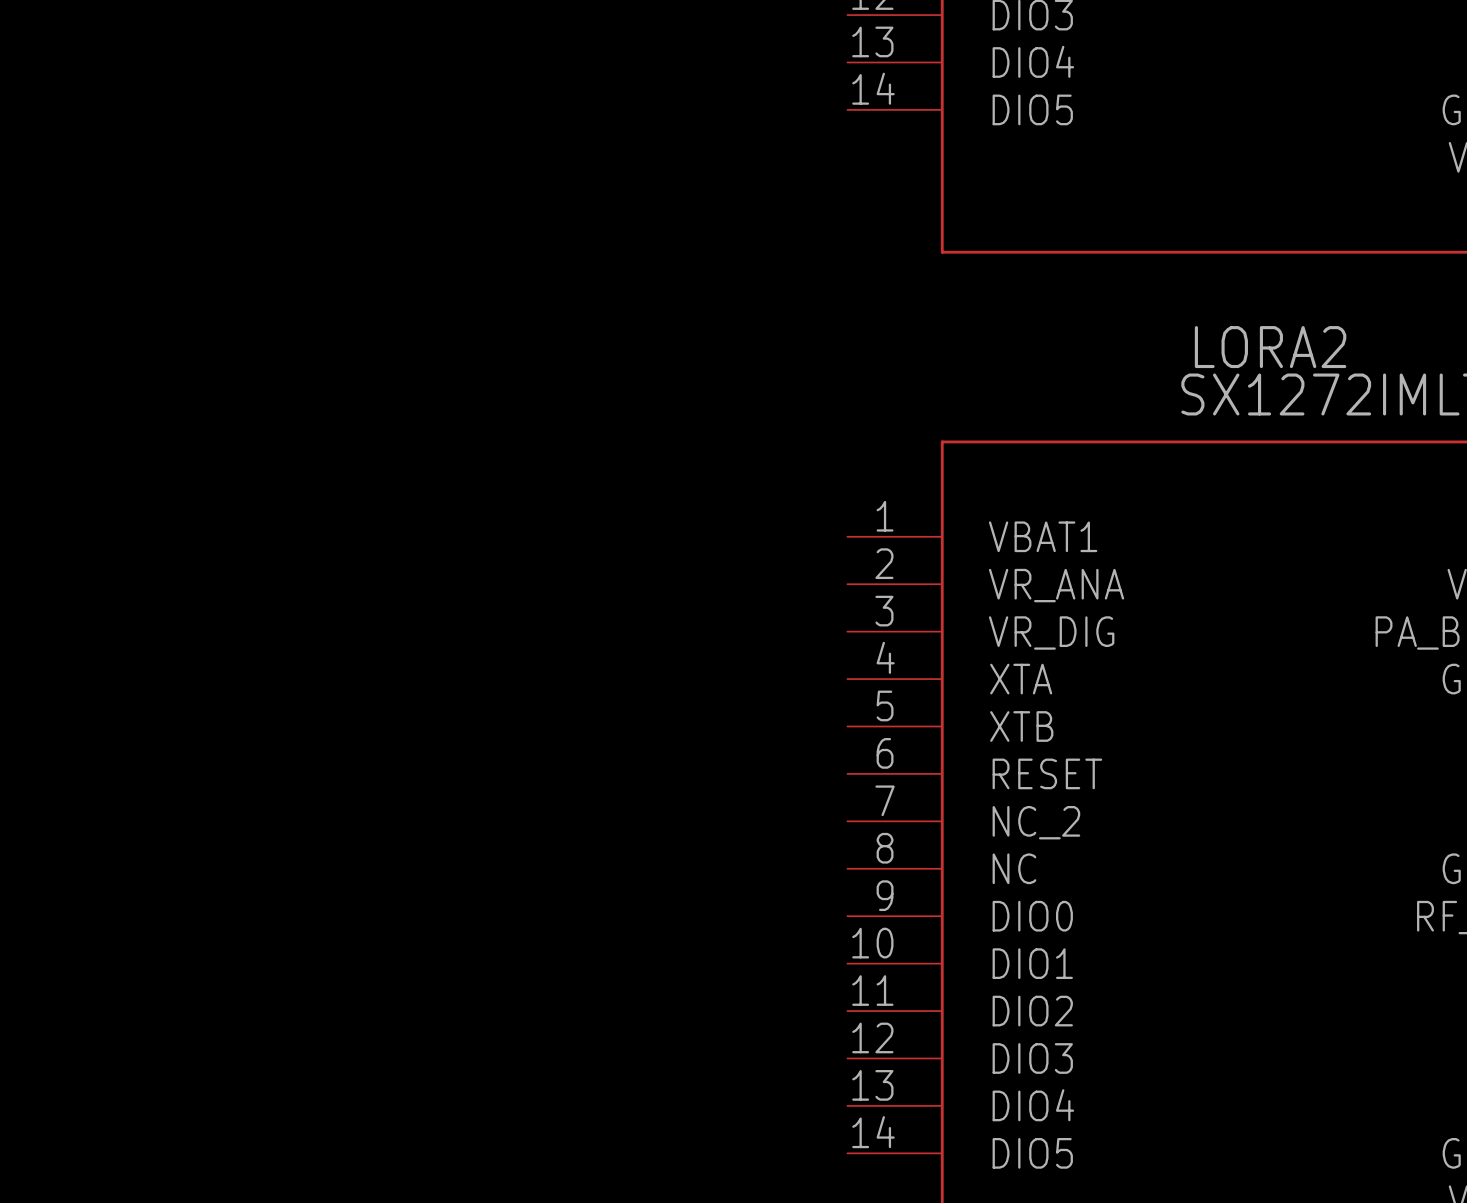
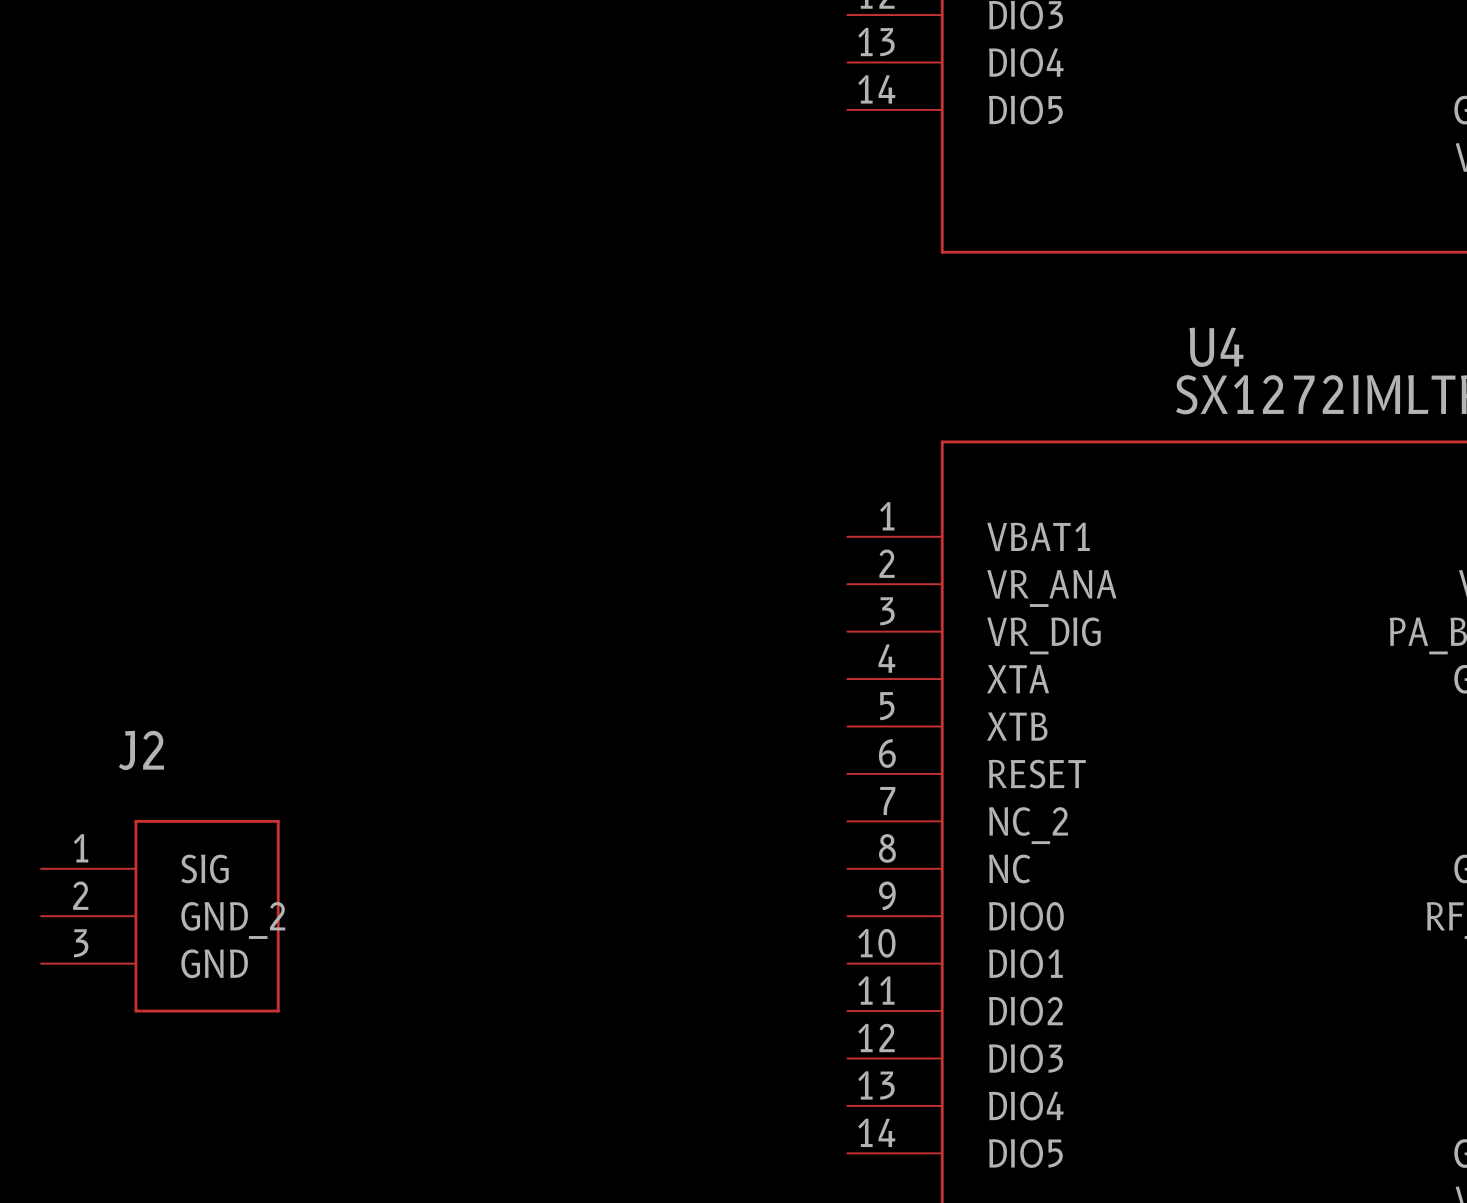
LORA2 name: LORA2 (1270, 347) -> U4 (1216, 347)
J2: none -> (160, 916)

